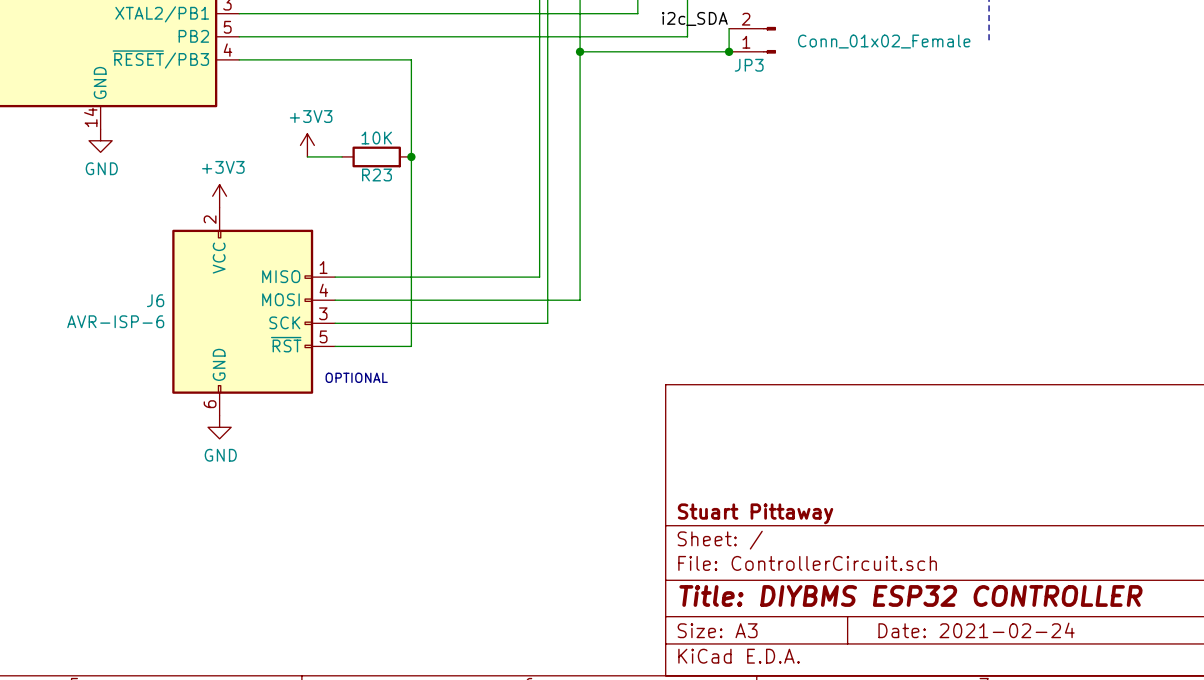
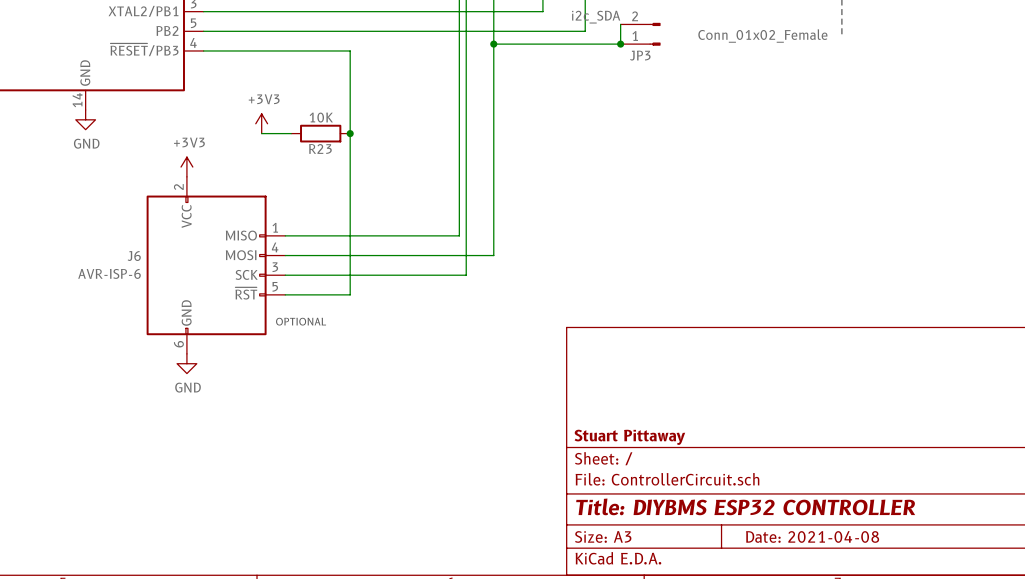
title block: Date: 2021-02-24 (976, 630) -> Date: 2021-04-08 (812, 536)

